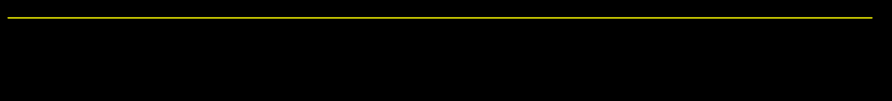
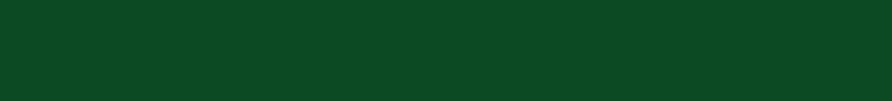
board edge: (871, 17) (8, 17) -> none

